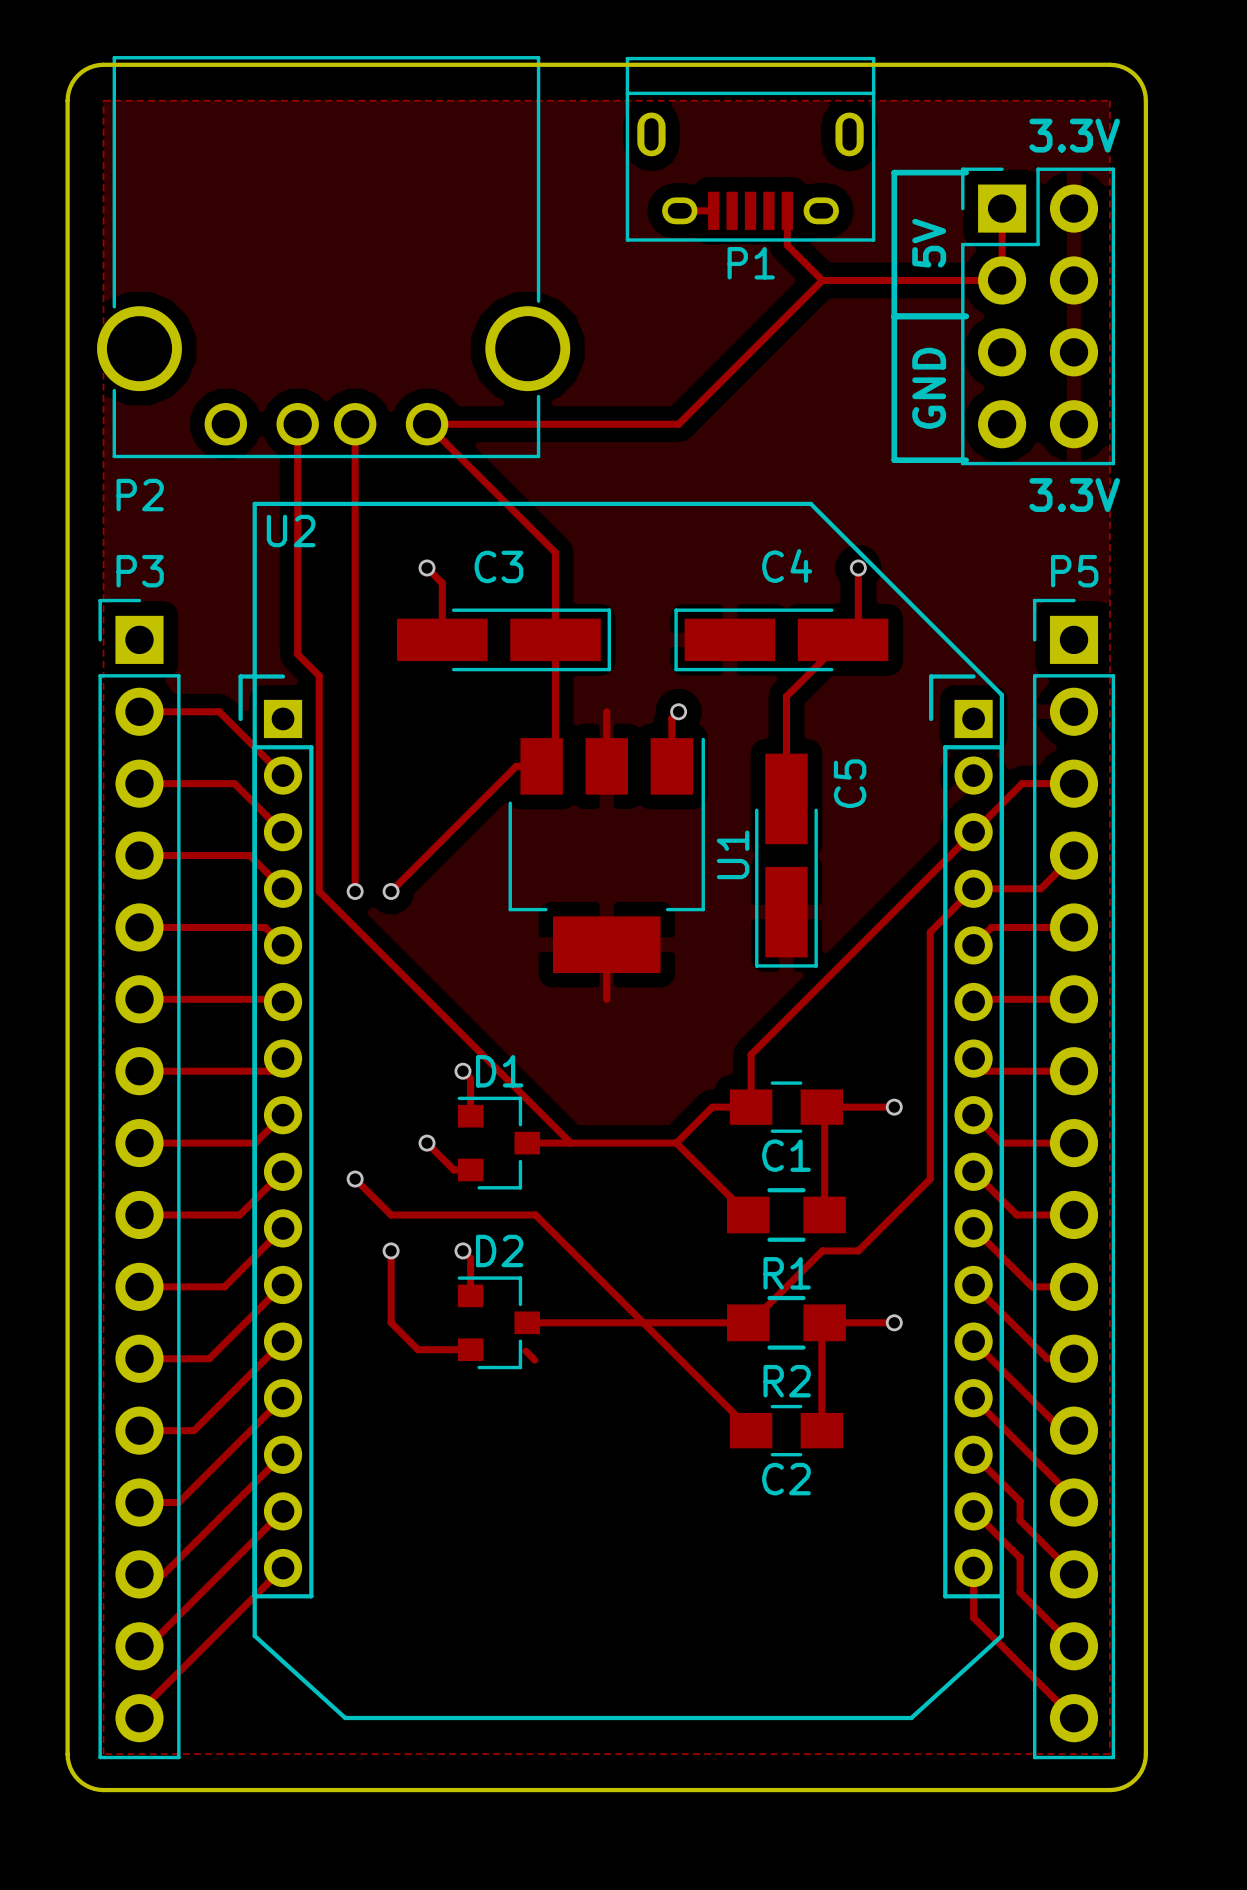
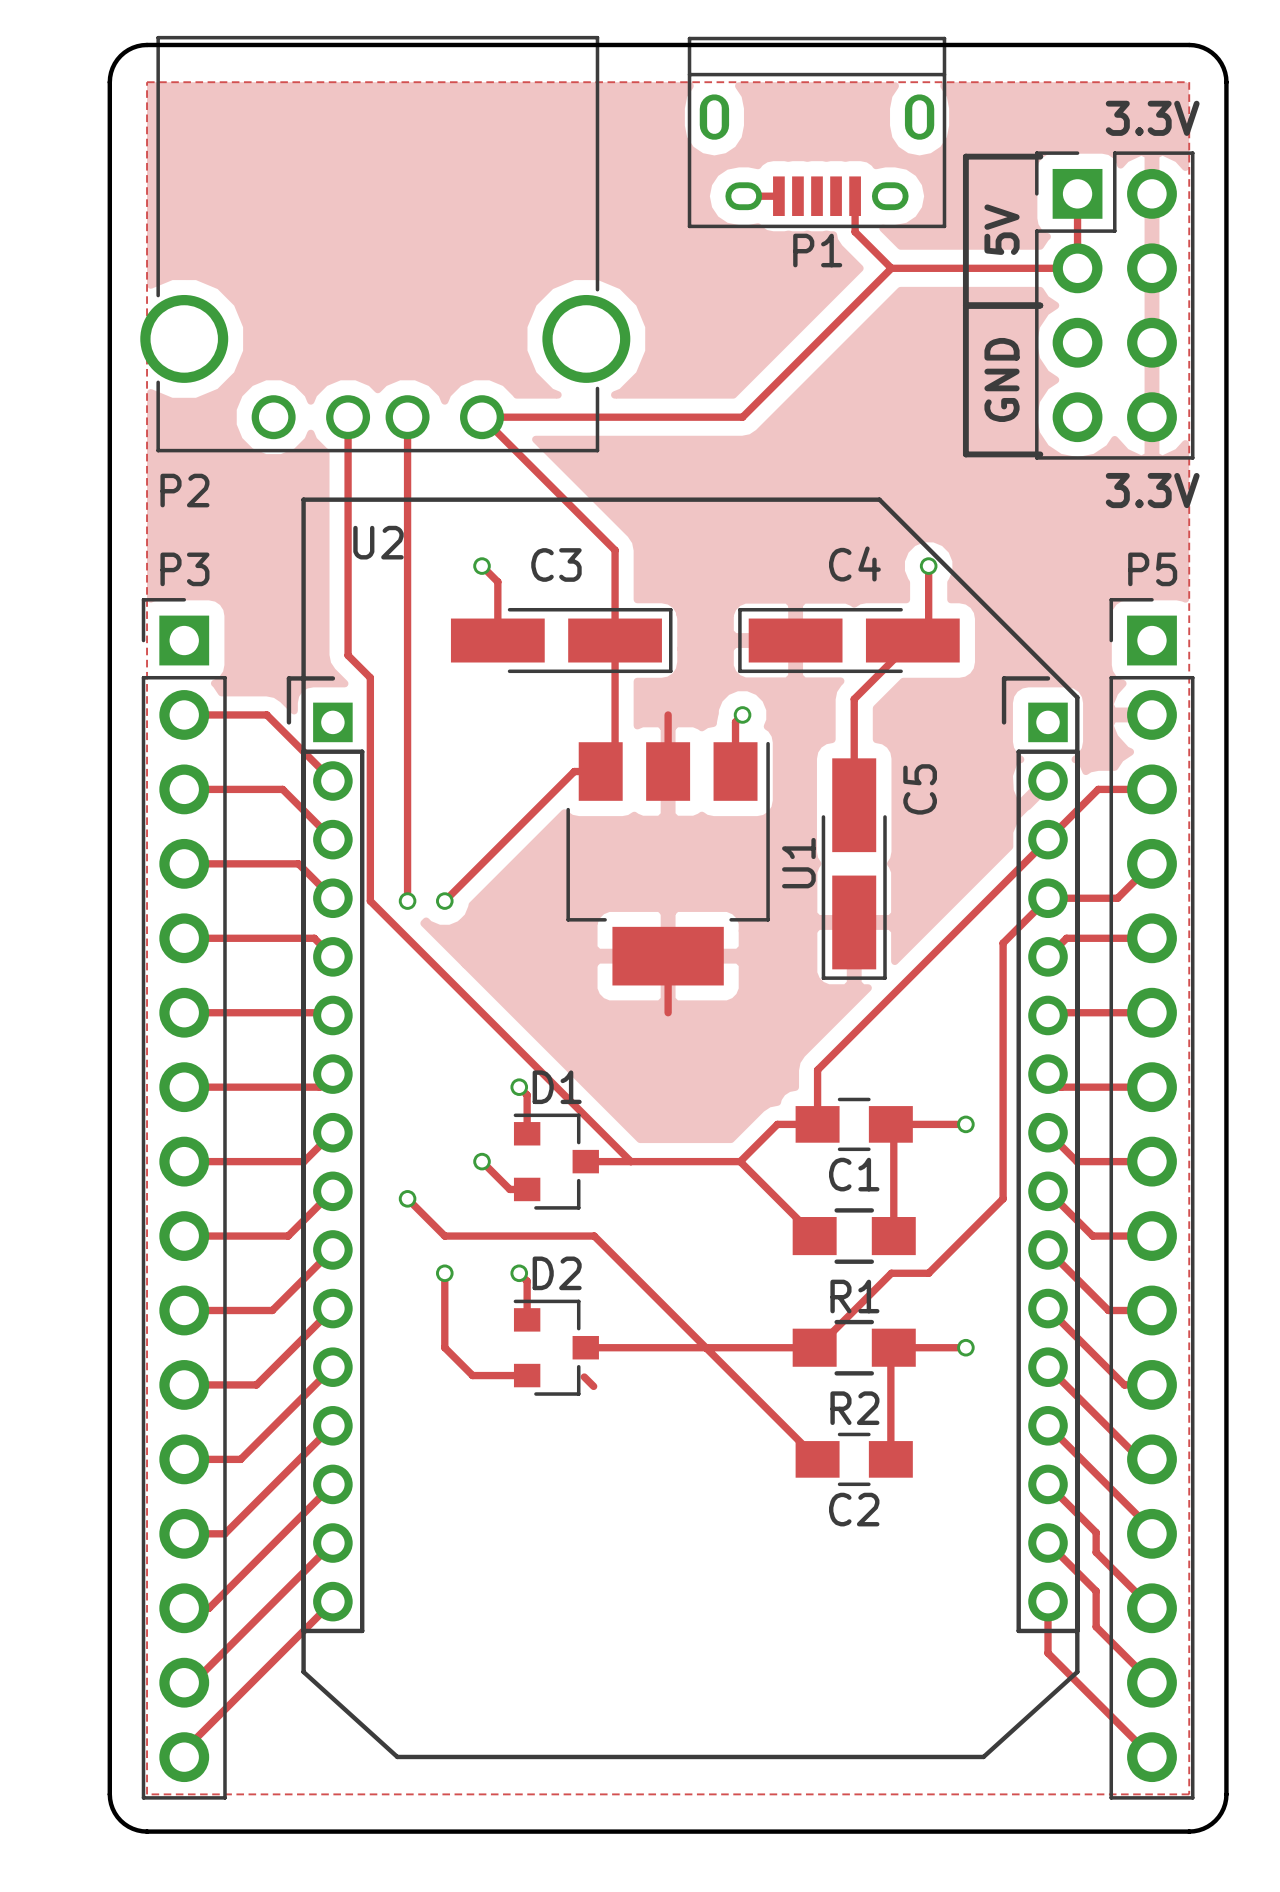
U2 name position: U2 (291, 531) -> U2 (378, 542)

